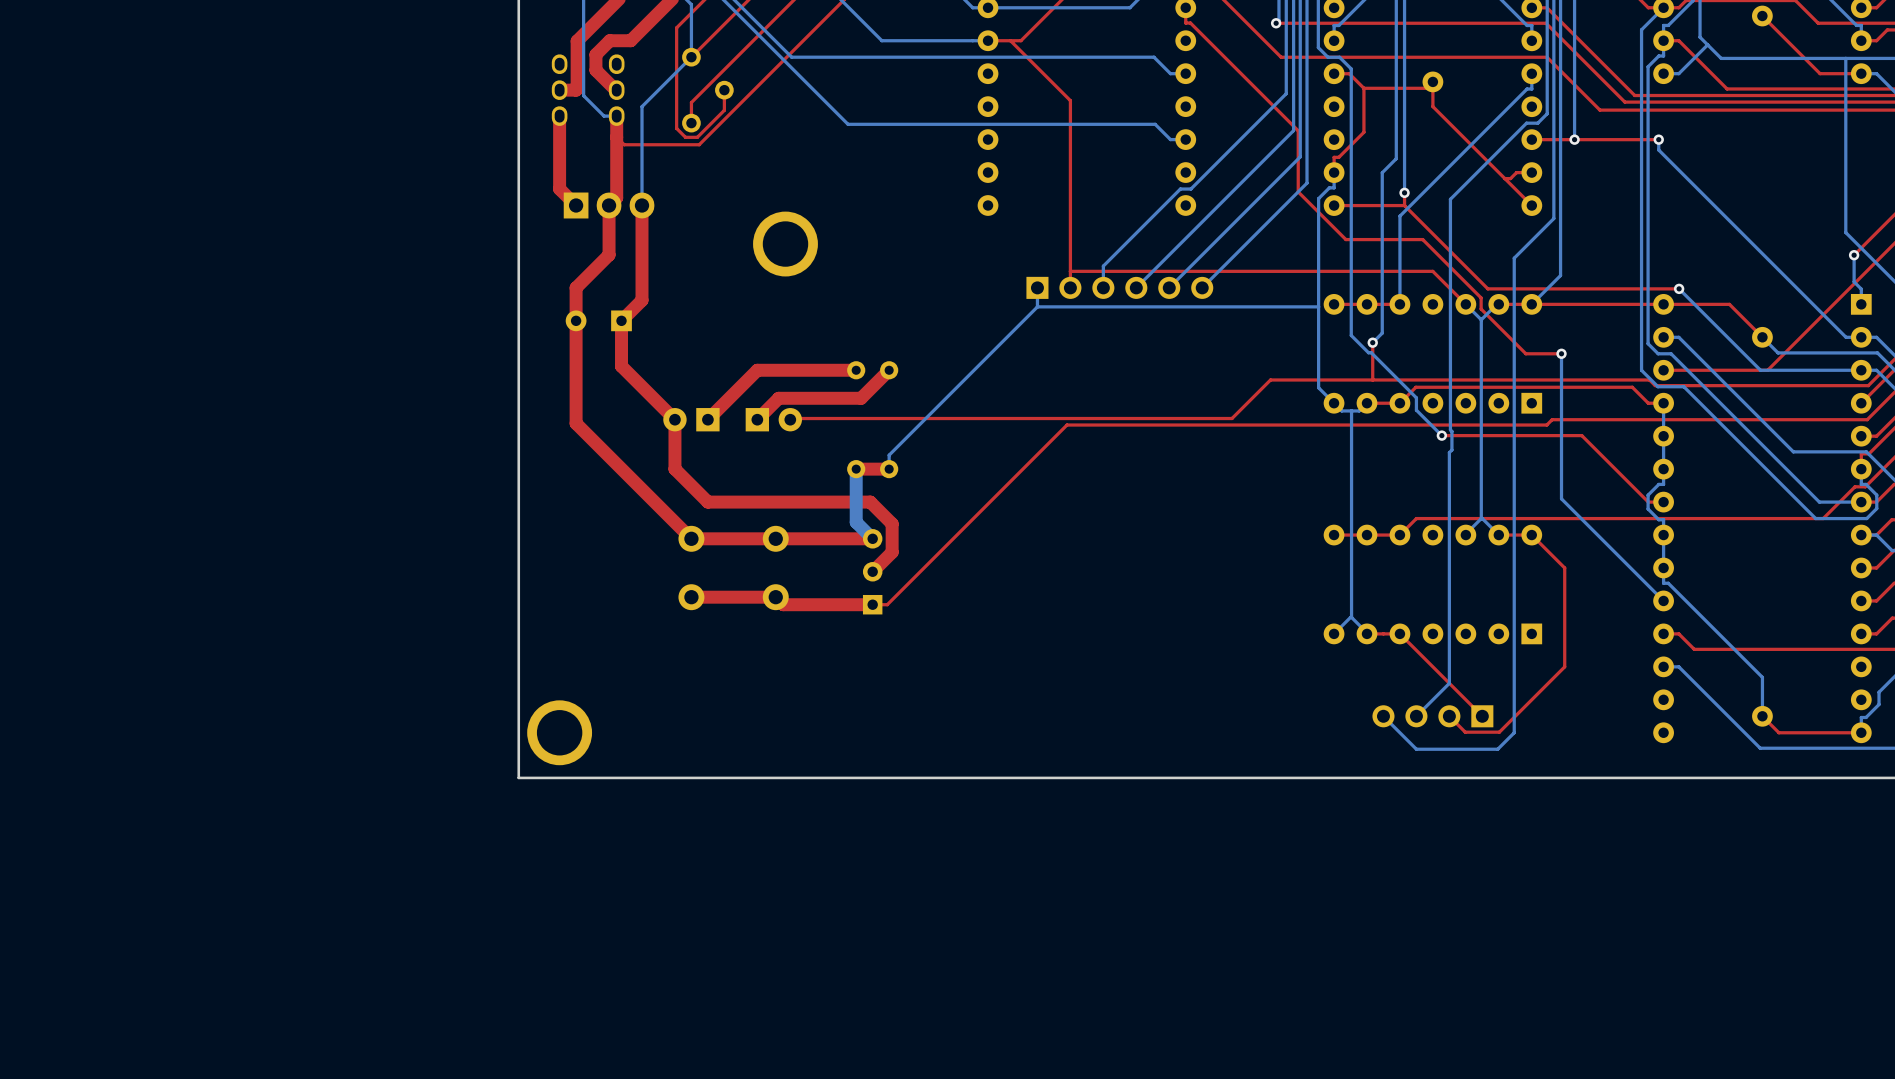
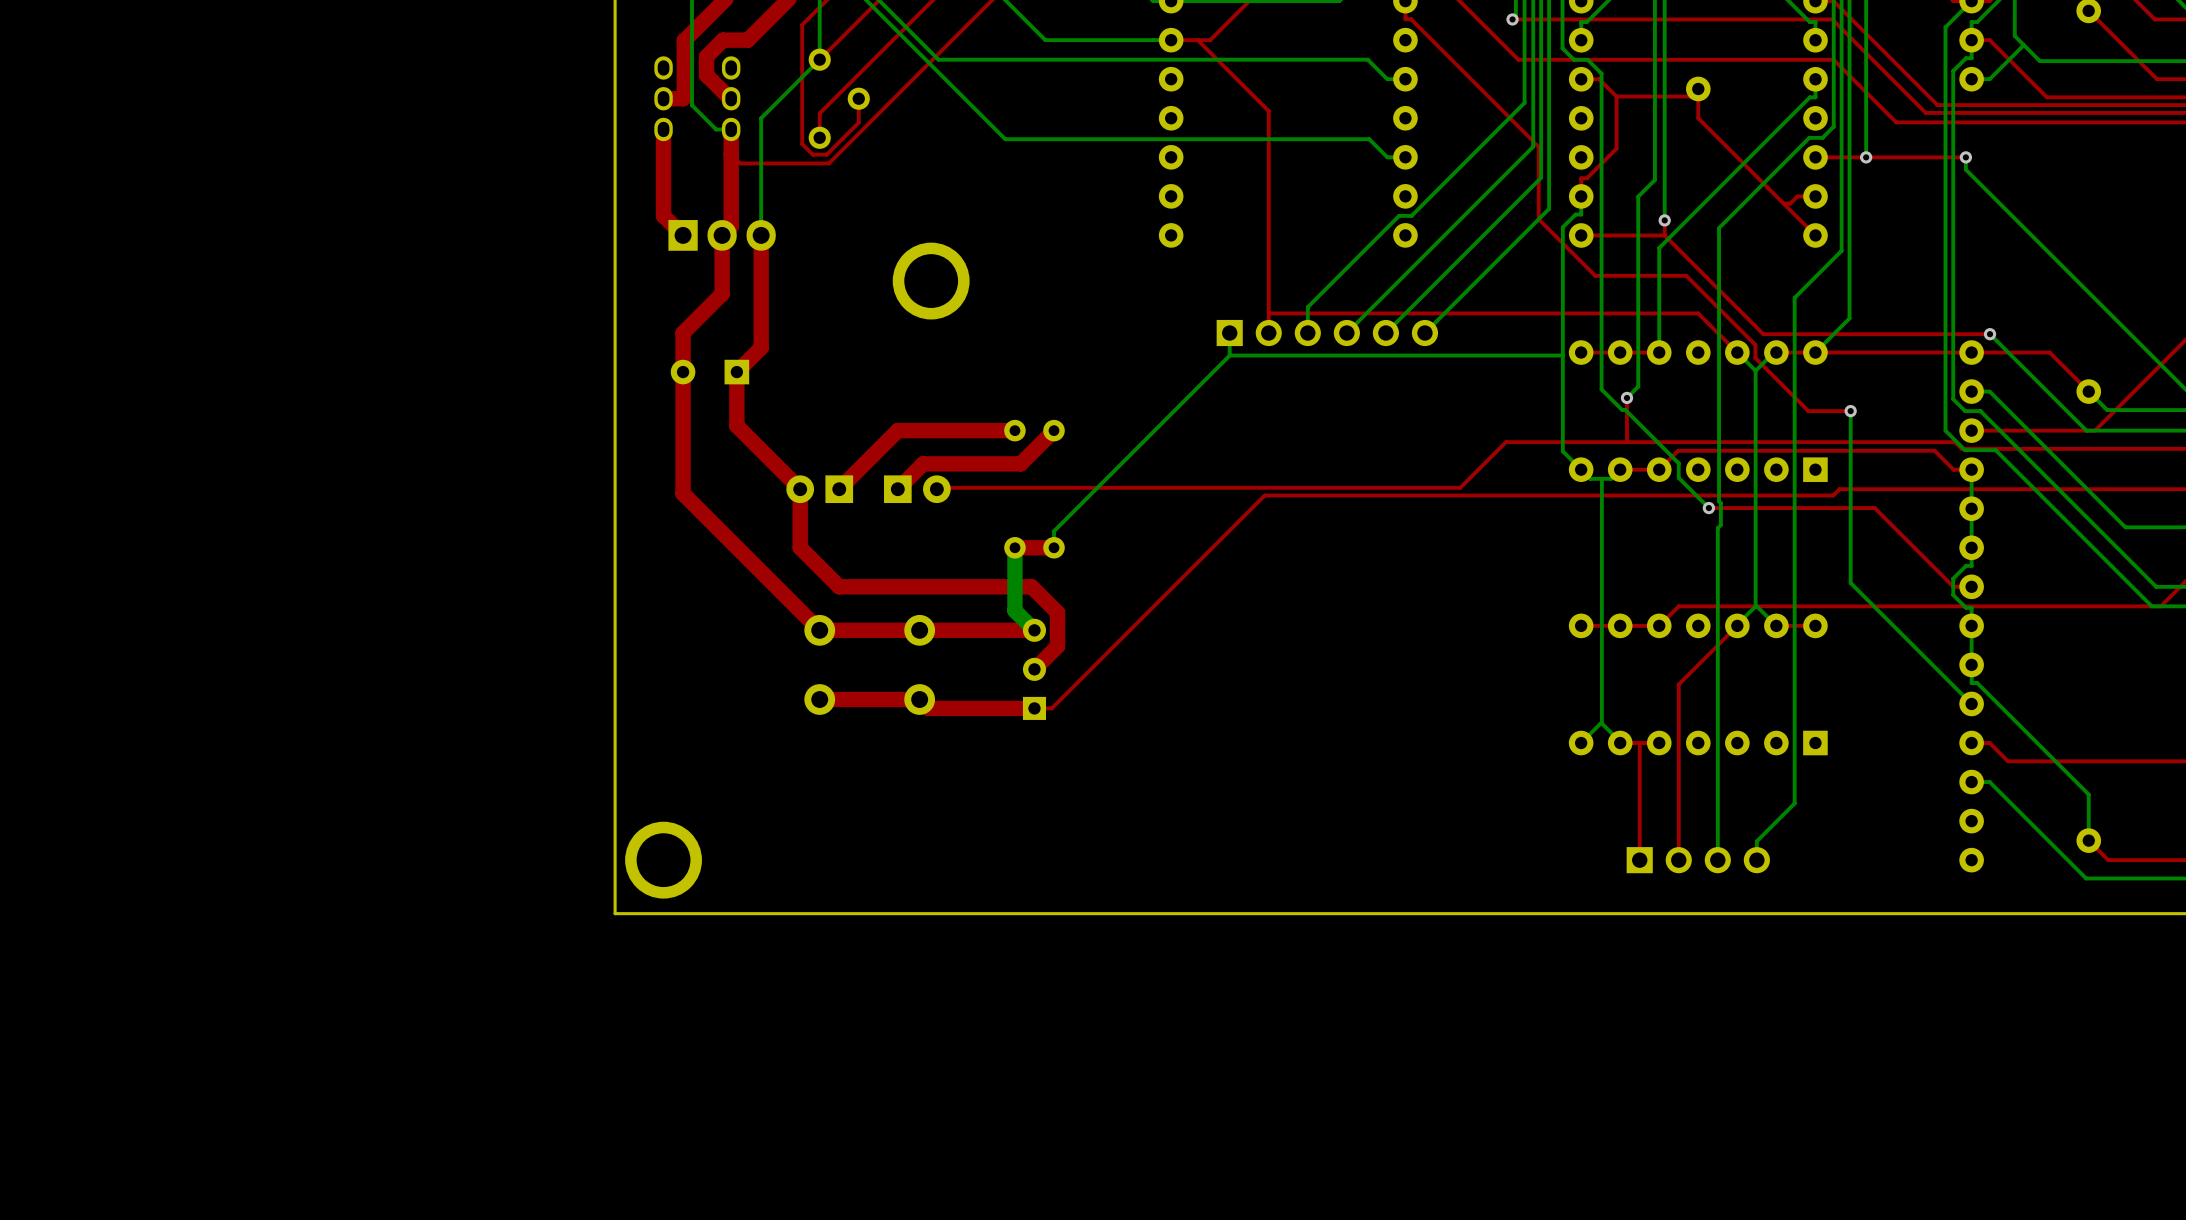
top track: none -> (1737, 625) (1678, 684) (1678, 860)
top track: (1531, 535) (1564, 568) (1564, 666) (1499, 732) (1465, 732) (1449, 716) -> none
top track: none -> (1639, 743) (1639, 860)
top track: (1399, 633) (1482, 716) -> none
bottom track: (1449, 683) (1416, 716) -> (1717, 801) (1717, 860)
bottom track: (1514, 684) (1514, 732) (1497, 749) (1416, 749) (1383, 716) -> (1794, 803) (1756, 841) (1756, 860)
part rotation: 0° (1432, 716) -> 180° (1698, 860)

